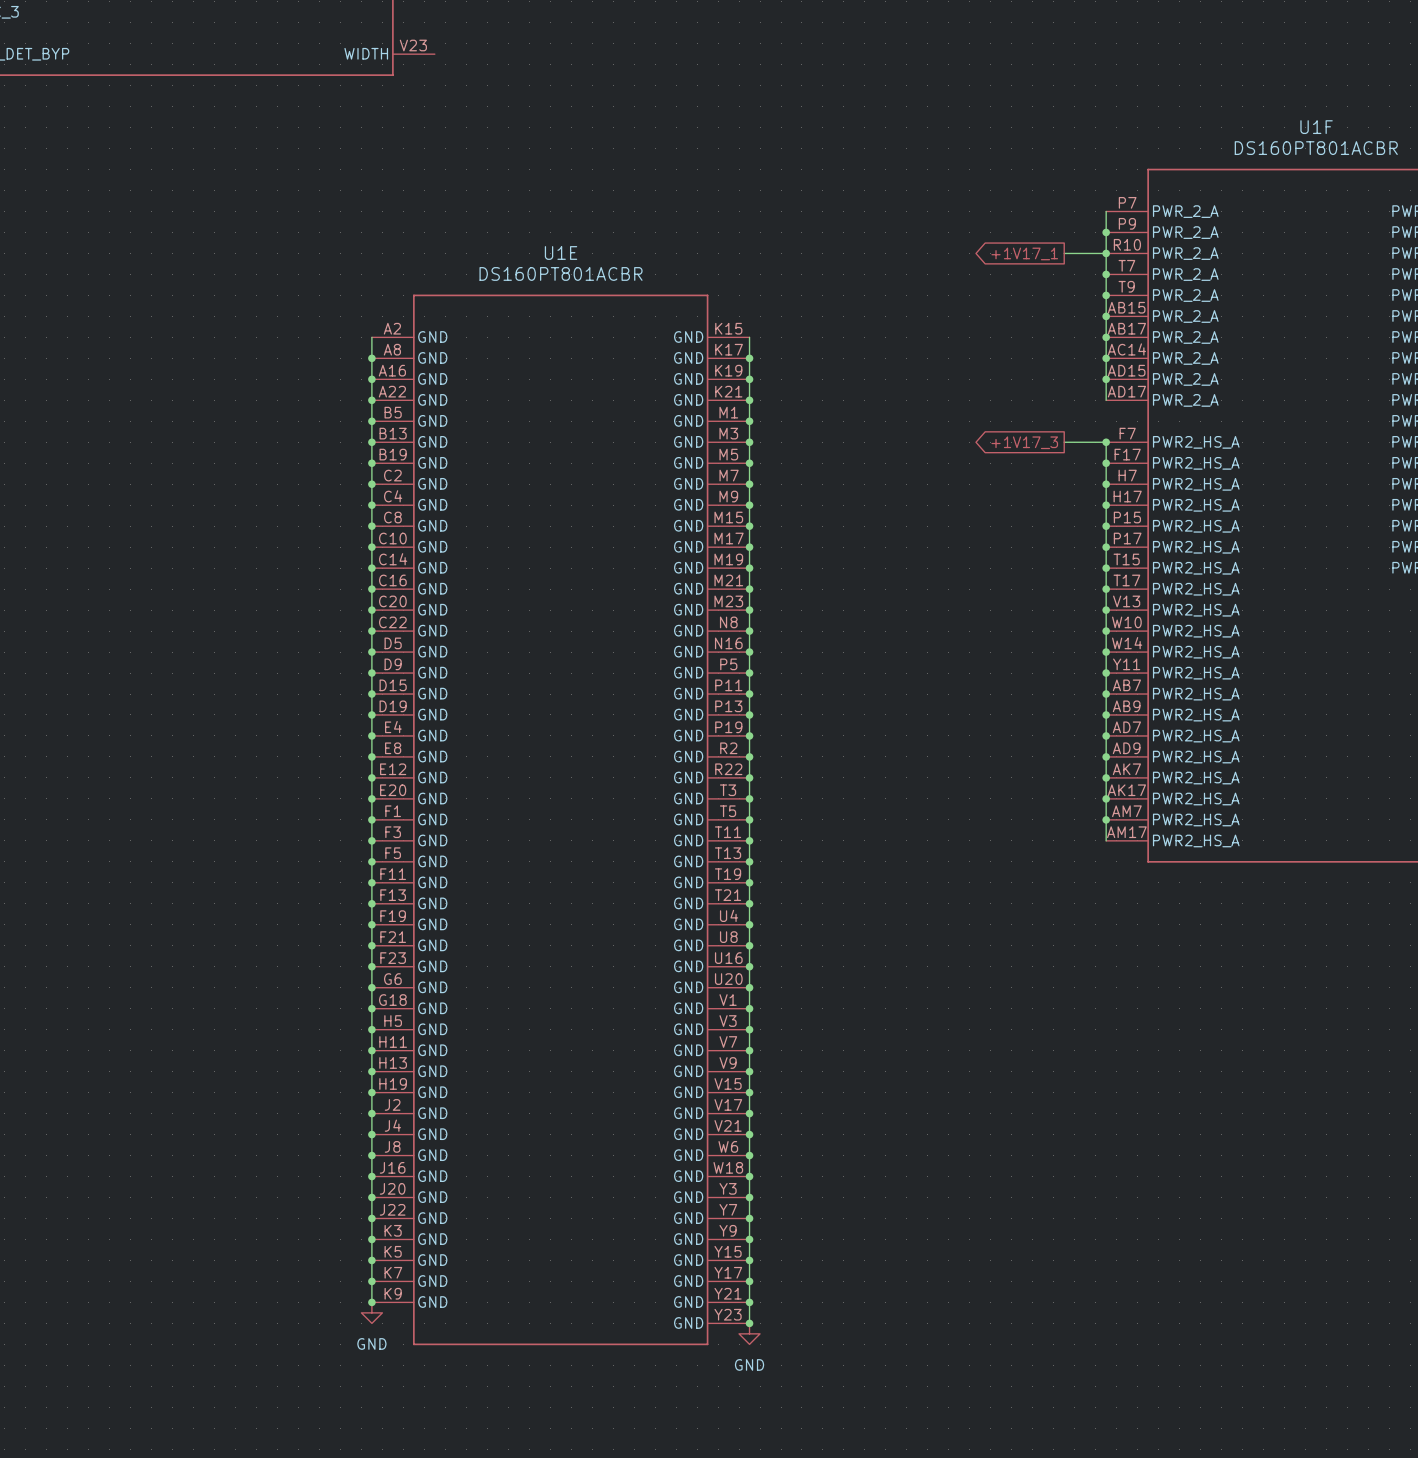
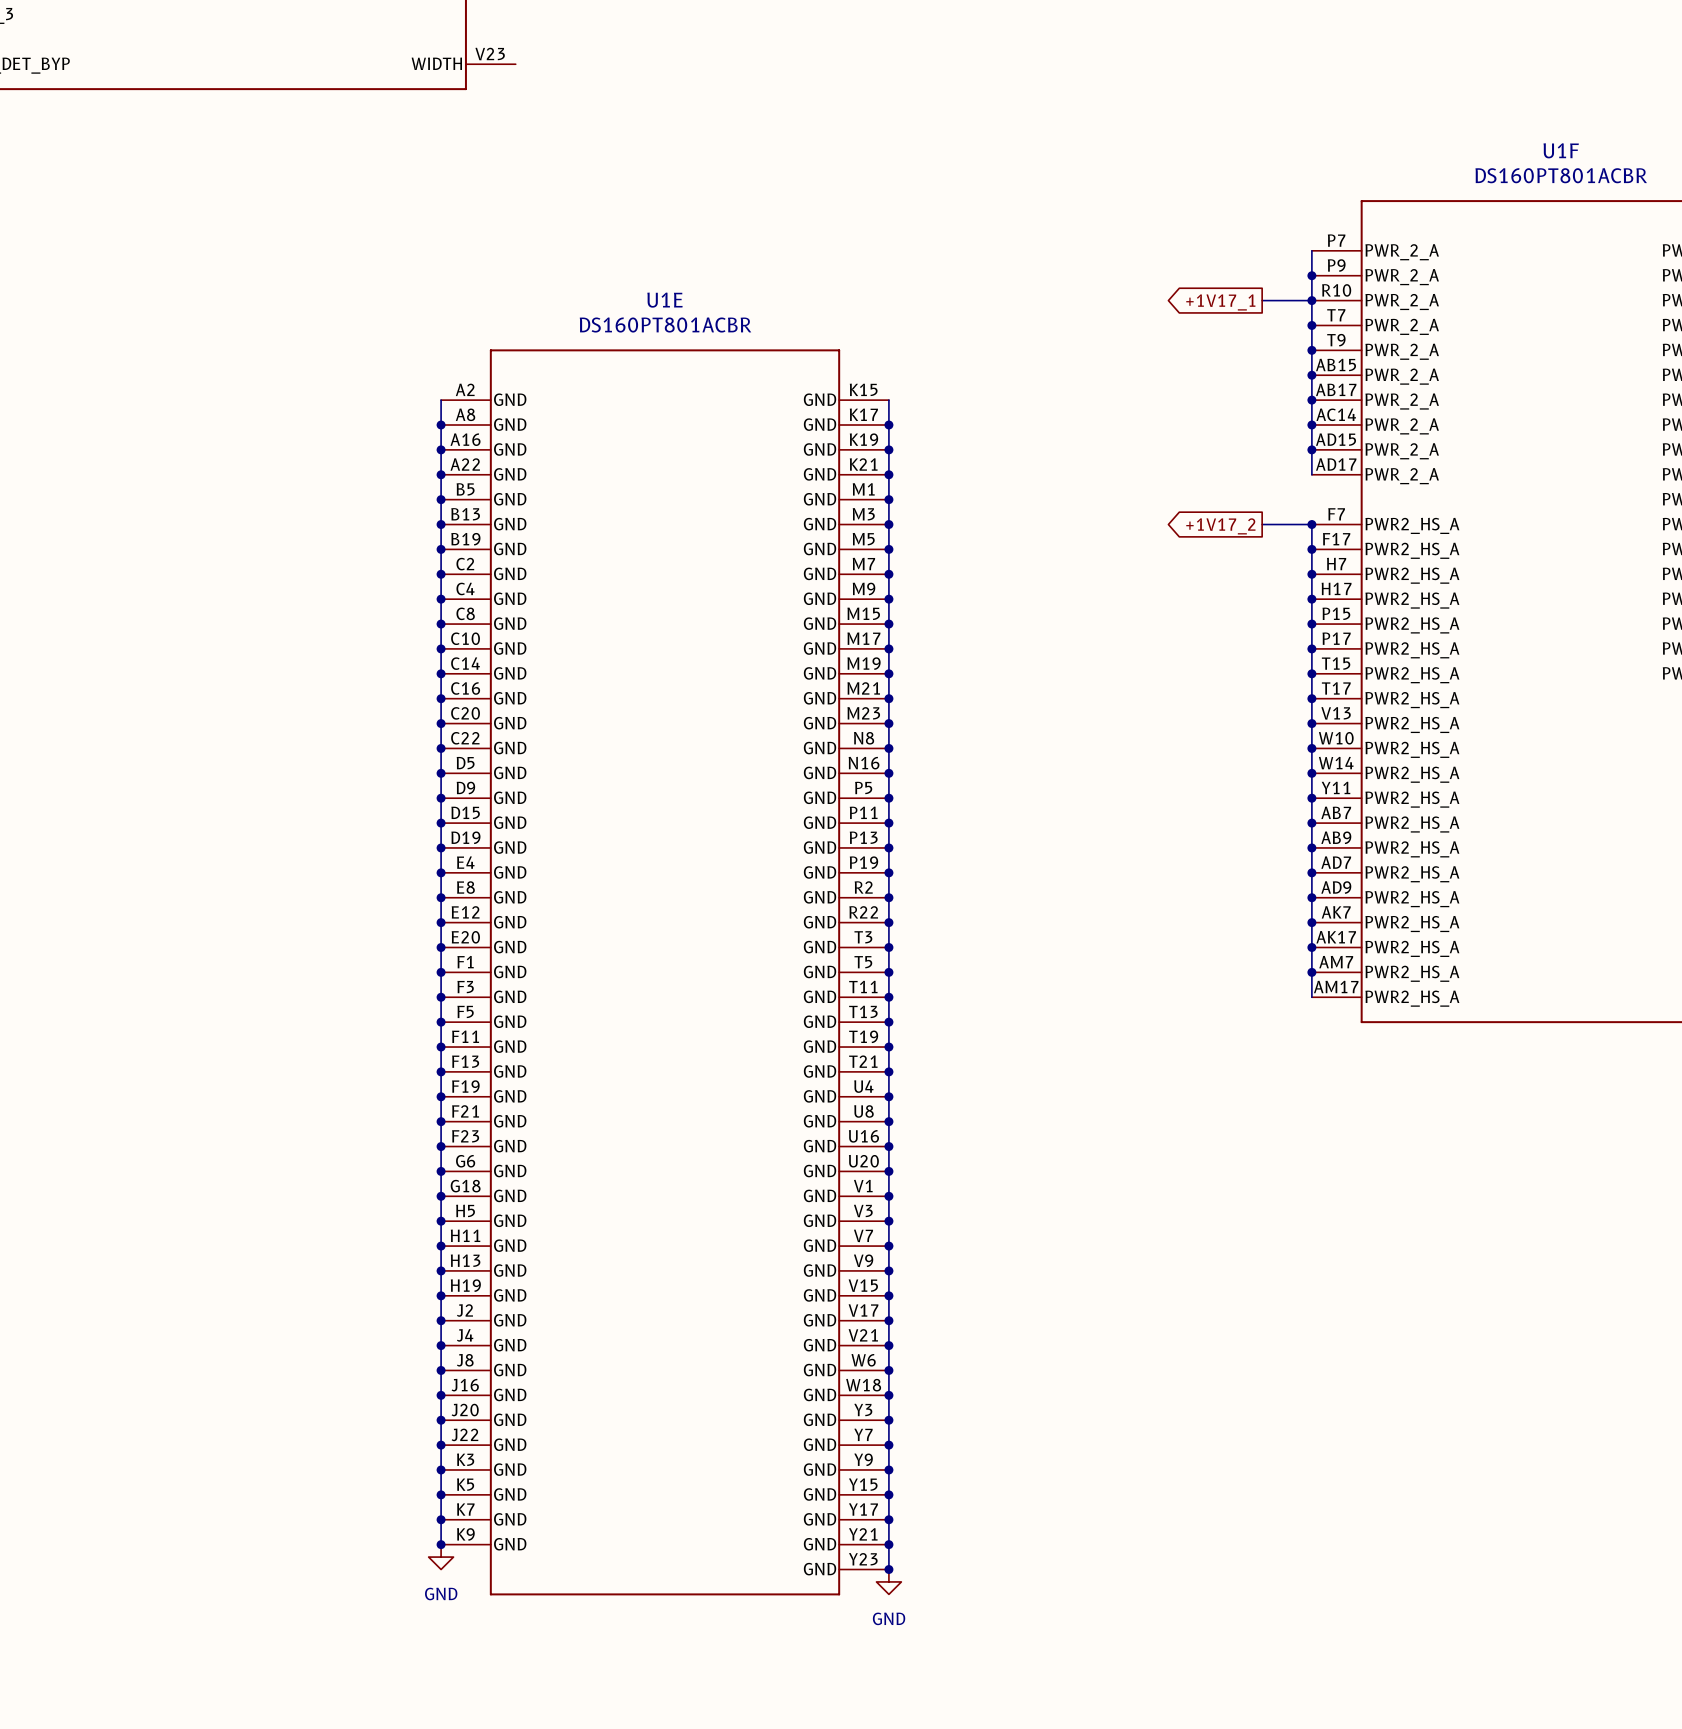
global label: +1V17_3 (1024, 442) -> +1V17_2 (1220, 526)

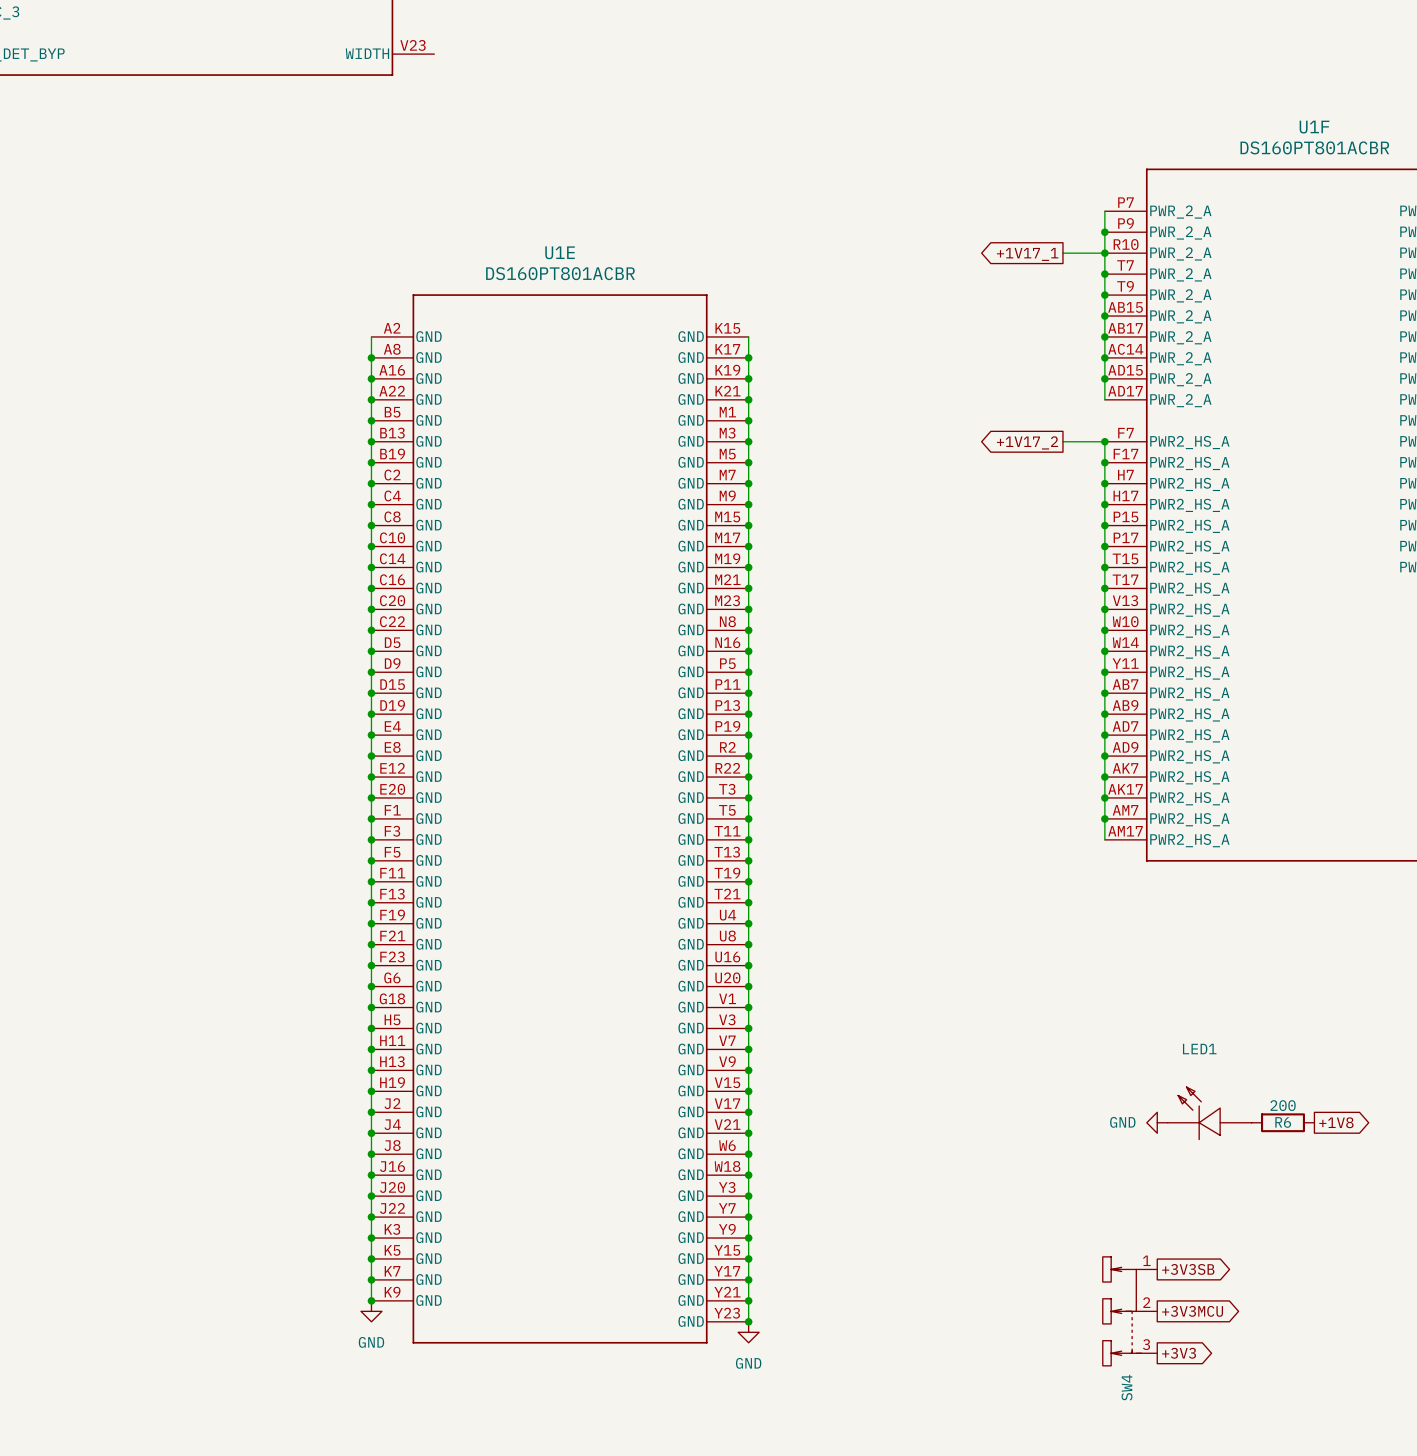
LED1: none -> (1209, 1113)
power symbol: none -> GND (1157, 1122)
R6: none -> 200 (1282, 1122)
global label: none -> +1V8 (1336, 1122)
global label: none -> +3V3SB (1188, 1269)
SW4: none -> (1130, 1311)
global label: none -> +3V3MCU (1192, 1311)
global label: none -> +3V3 (1179, 1353)

